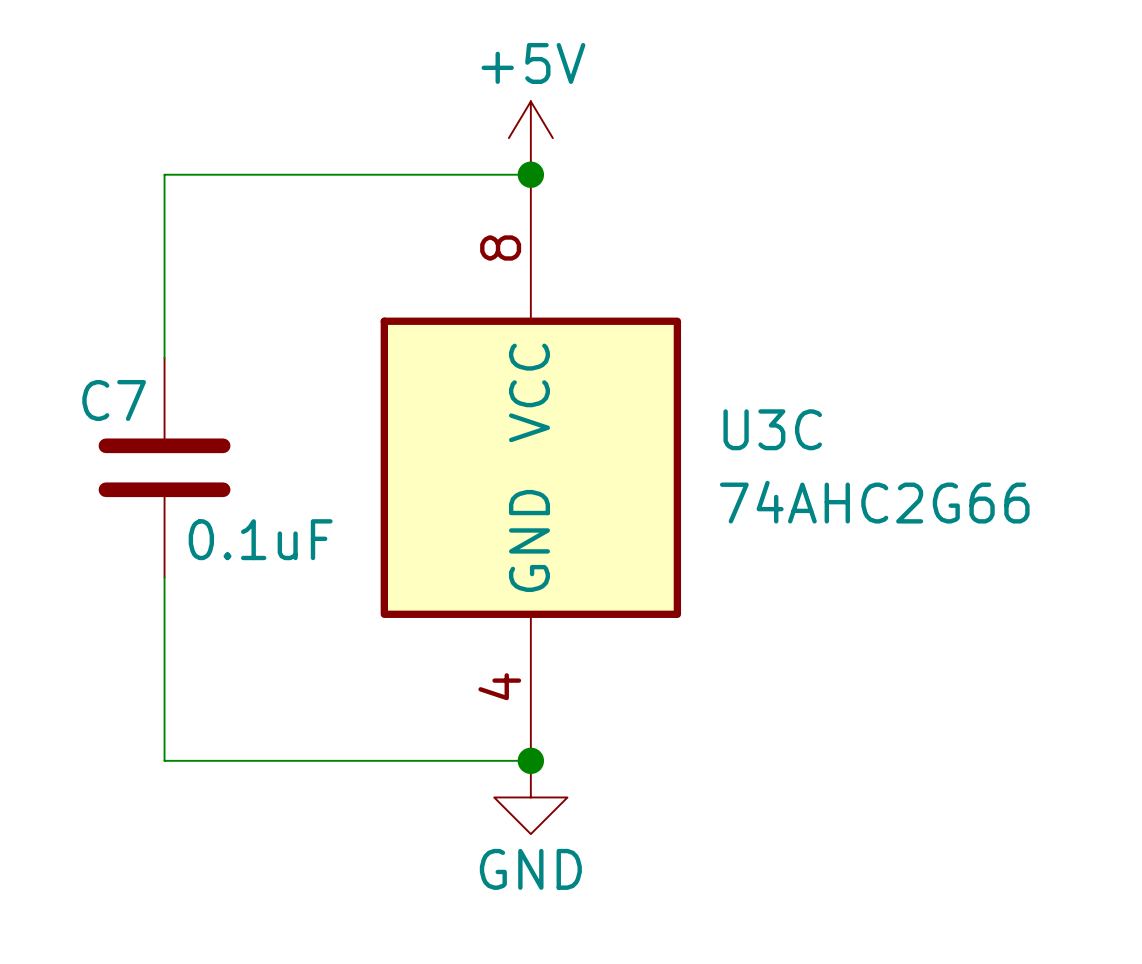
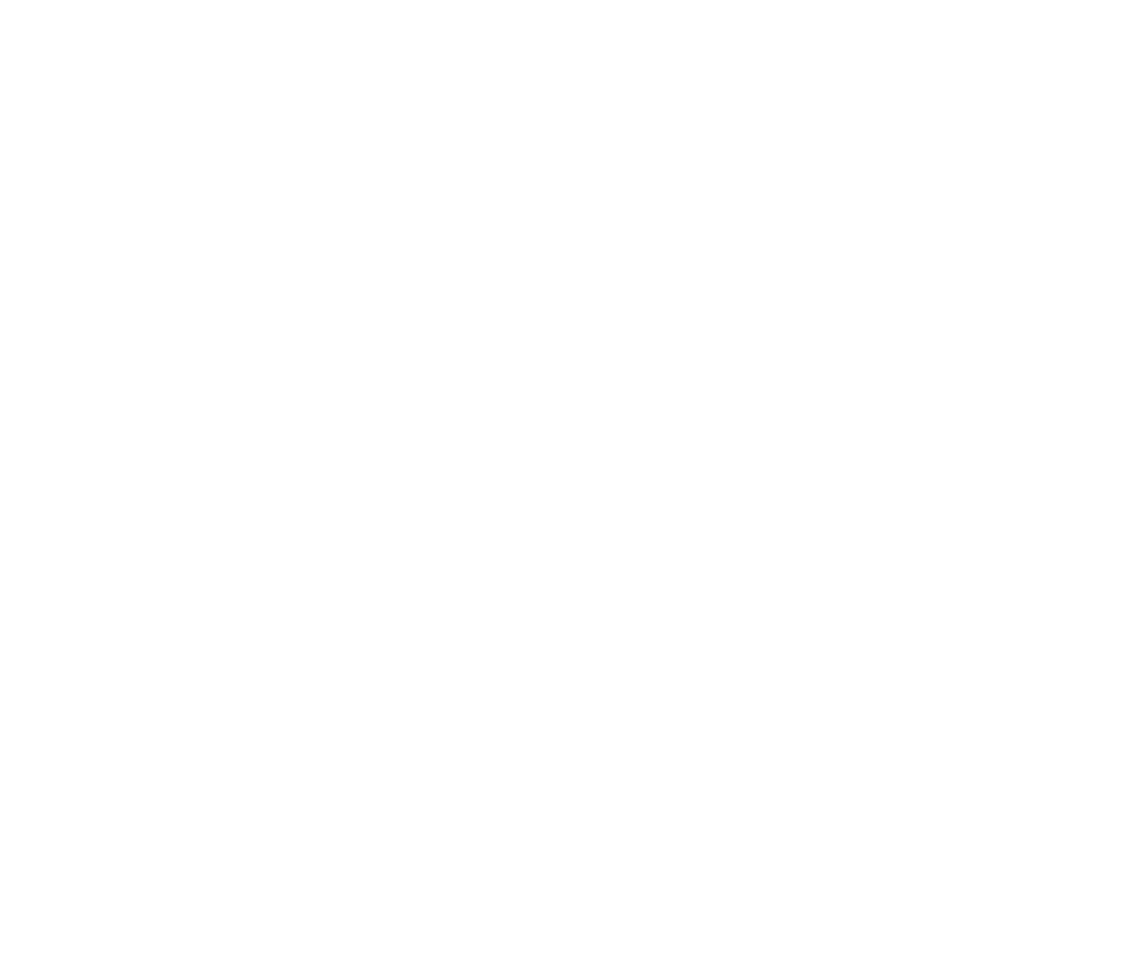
power symbol: +5V (530, 138) -> none
wire: (530, 174) (164, 174) (164, 357) -> none
junction: (530, 174) -> none
C7: 0.1uF (164, 467) -> none
U3C: 74AHC2G66 (530, 467) -> none
wire: (164, 577) (164, 760) (530, 760) -> none
junction: (530, 760) -> none
power symbol: GND (530, 797) -> none

